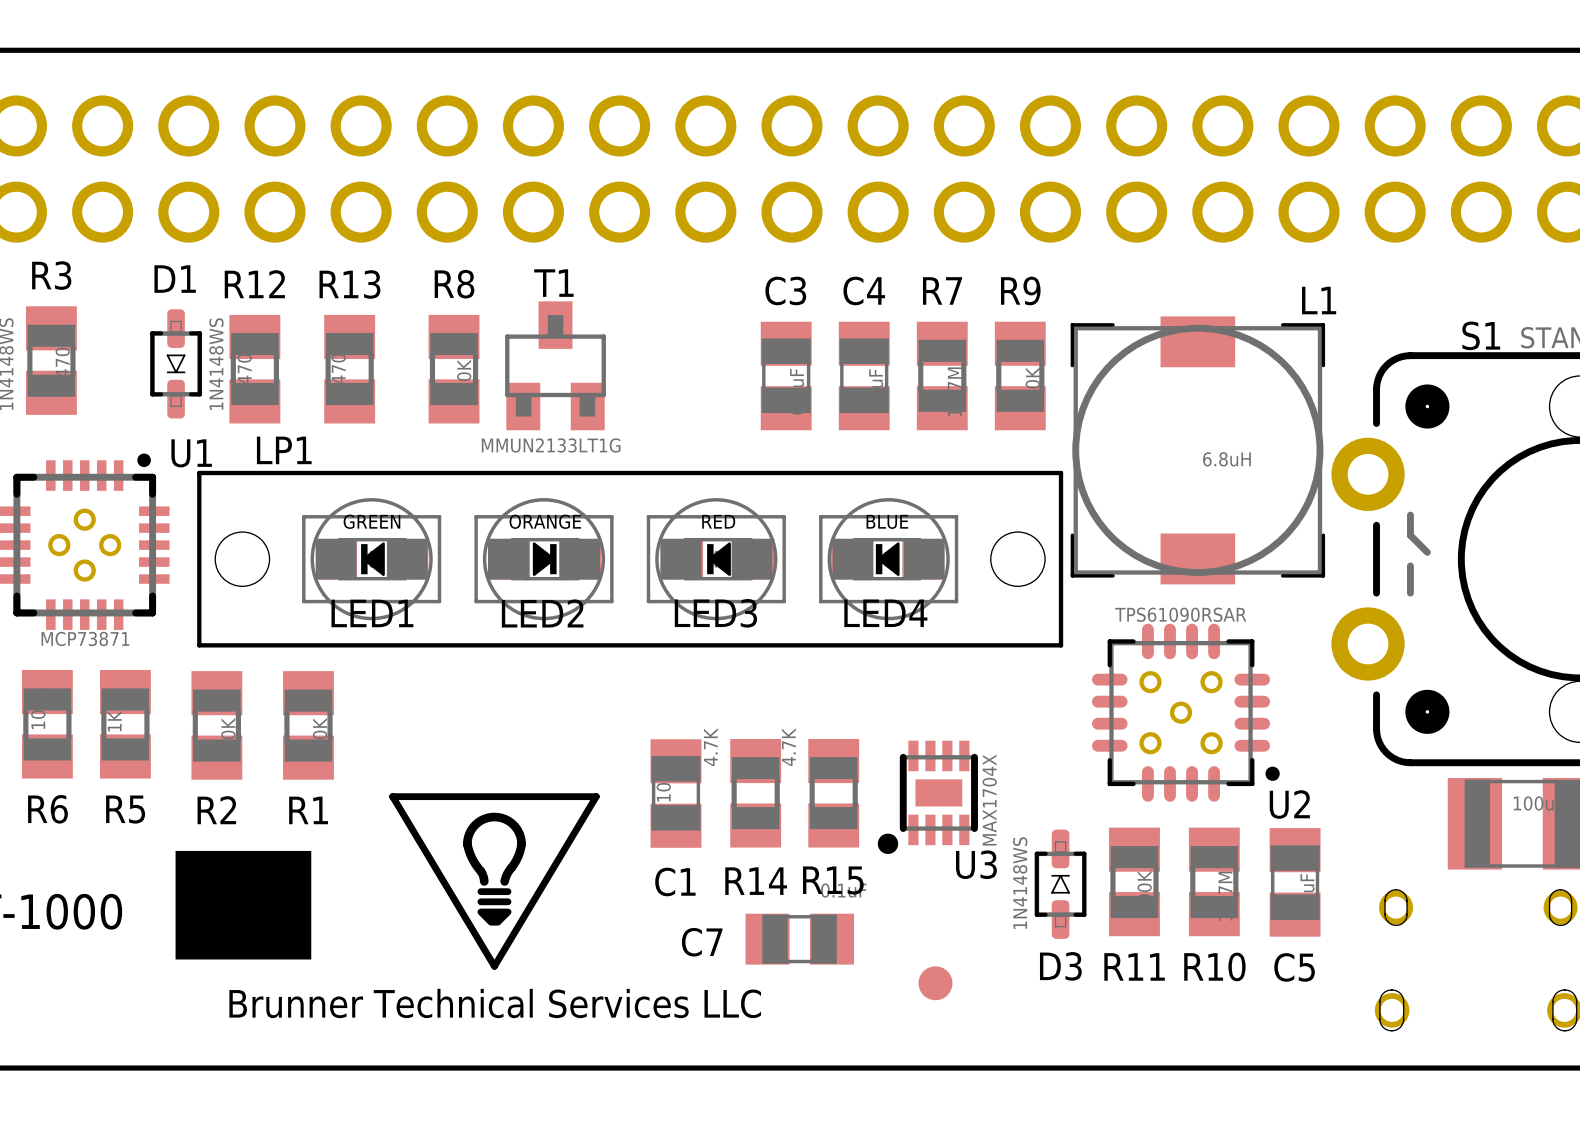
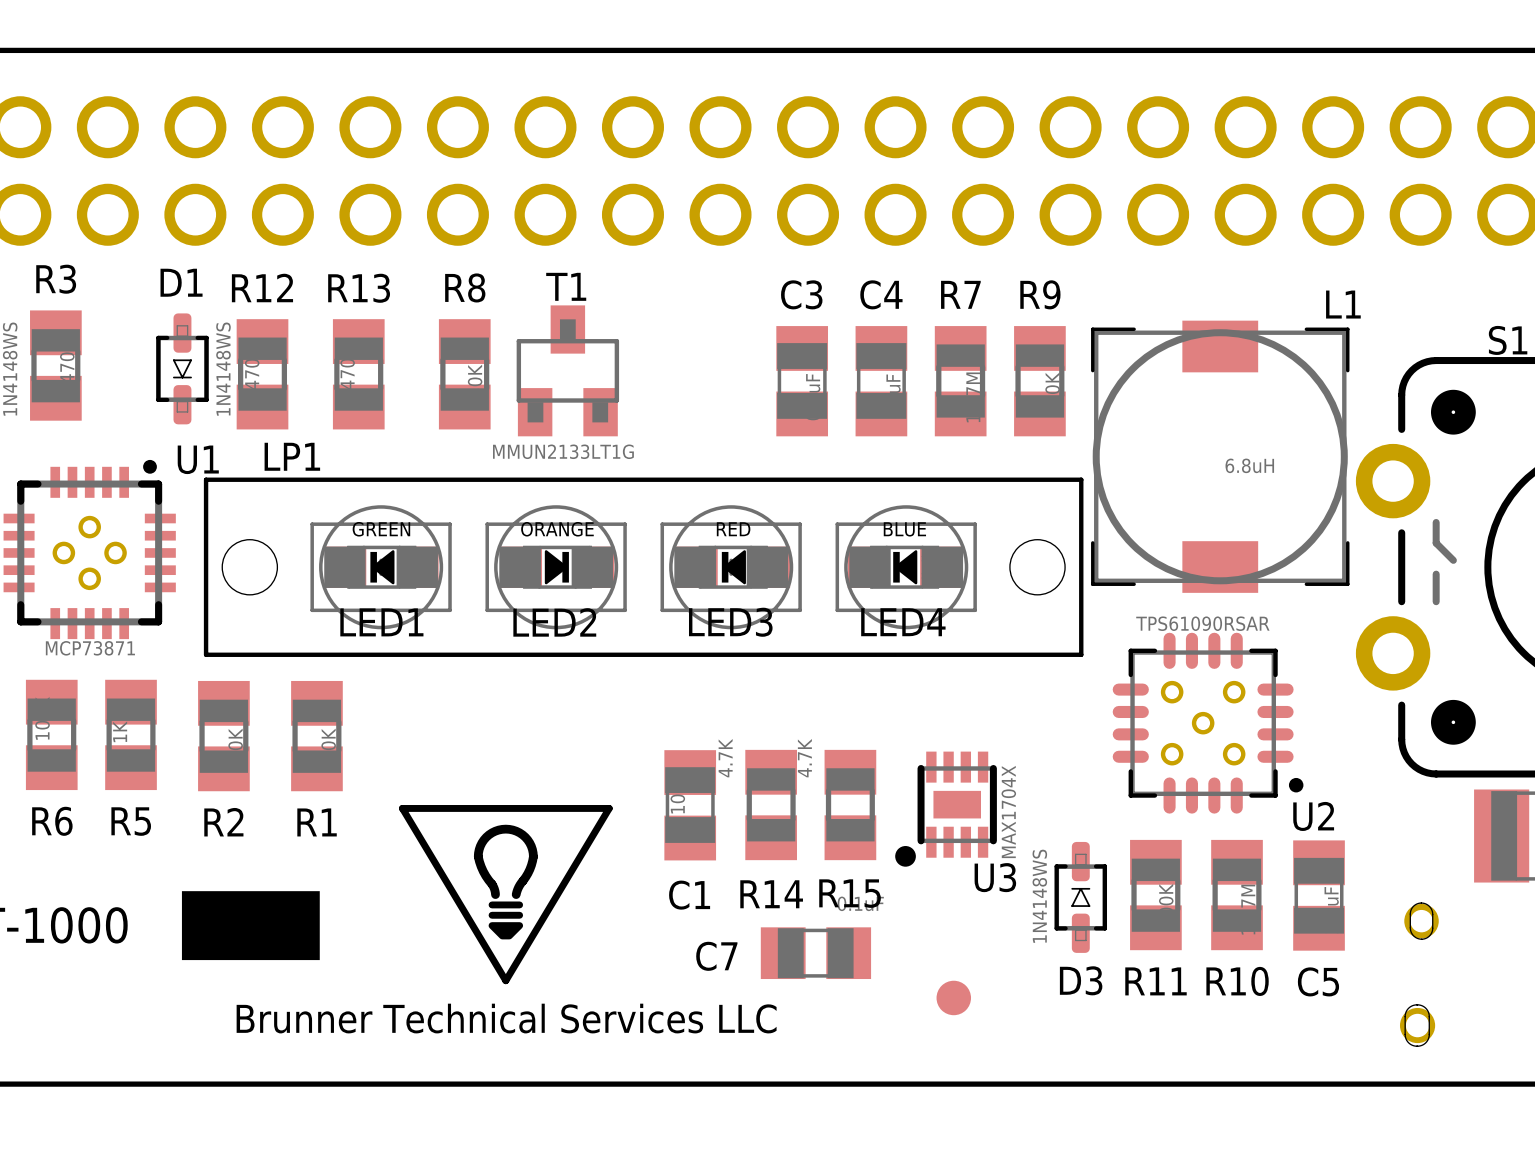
drawing shape: [175, 850, 312, 960] -> [181, 891, 320, 961]

